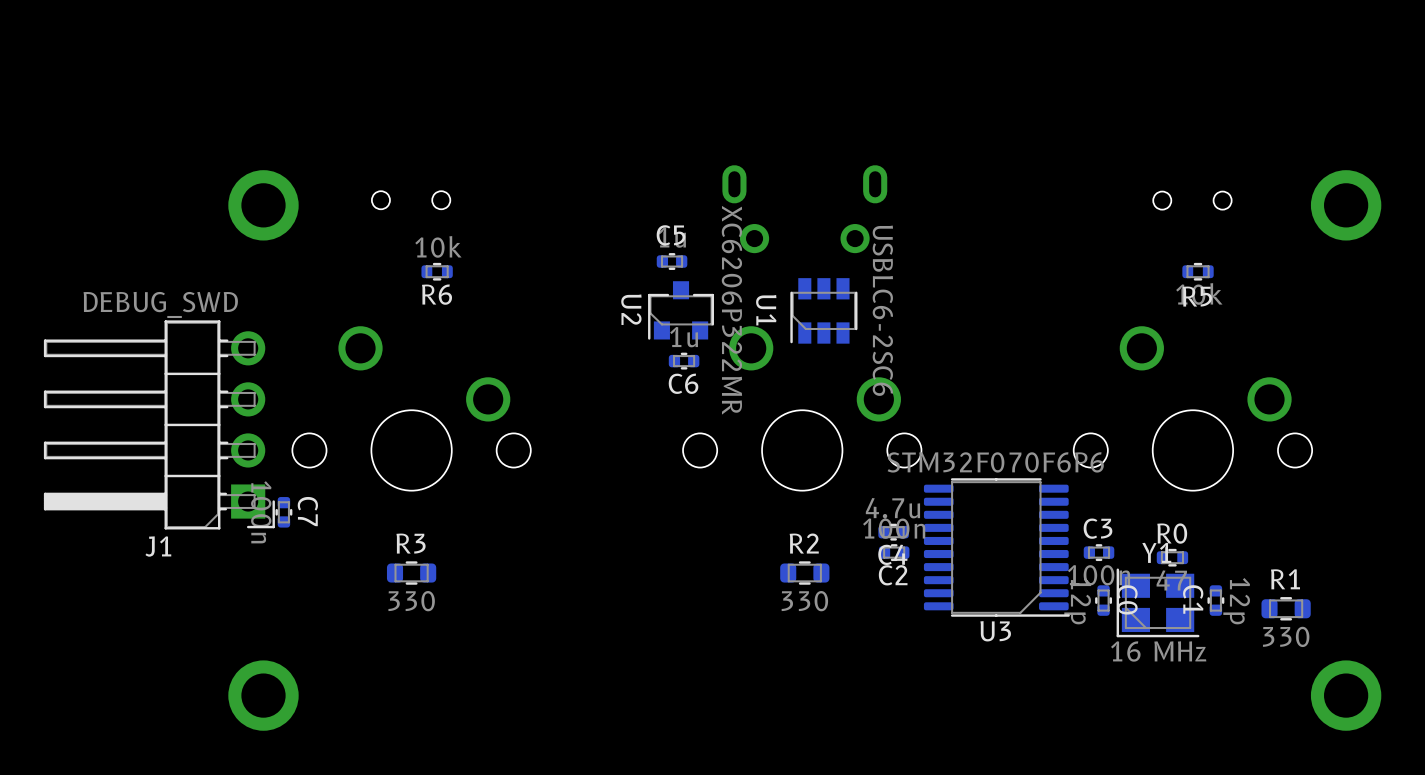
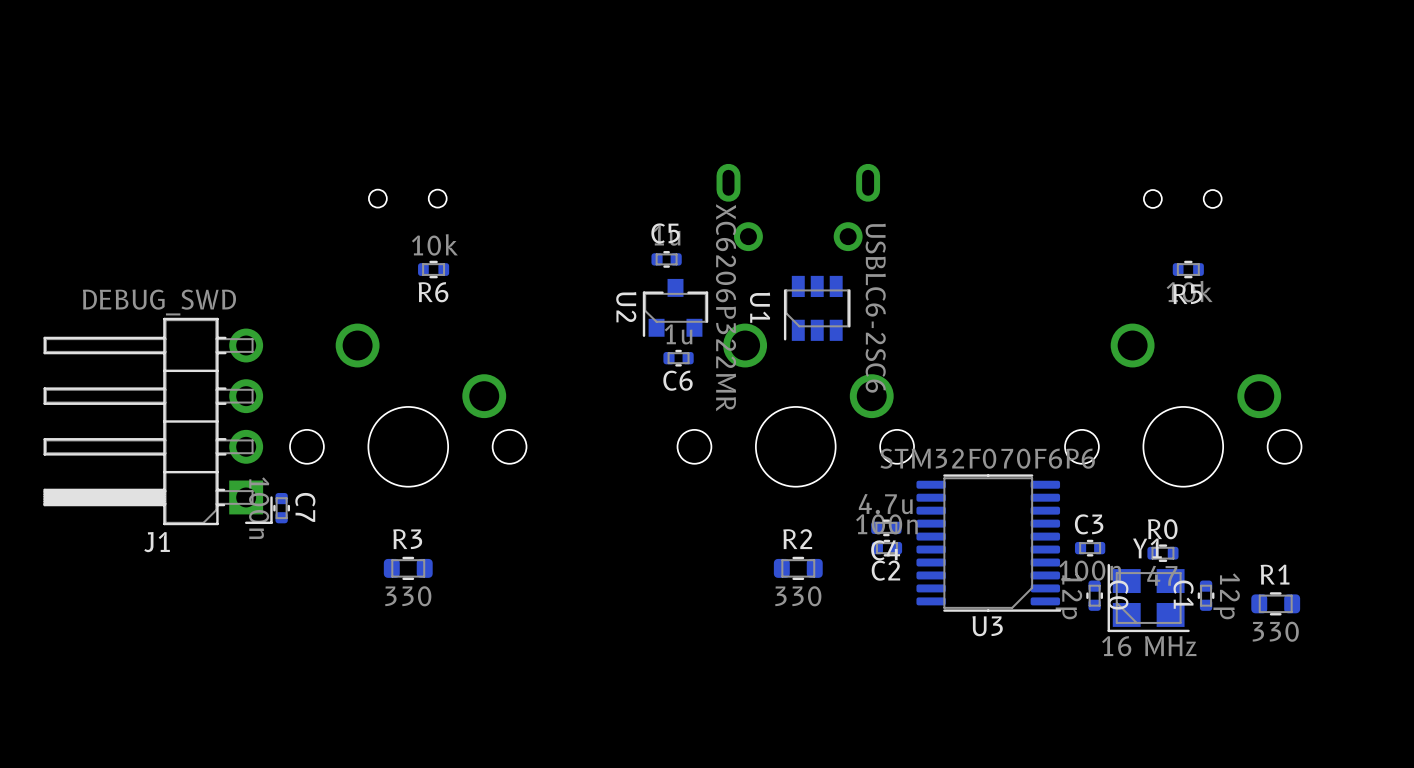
part: (263, 205) -> none
part: (1346, 205) -> none
part: (263, 695) -> none
part: (1346, 695) -> none

